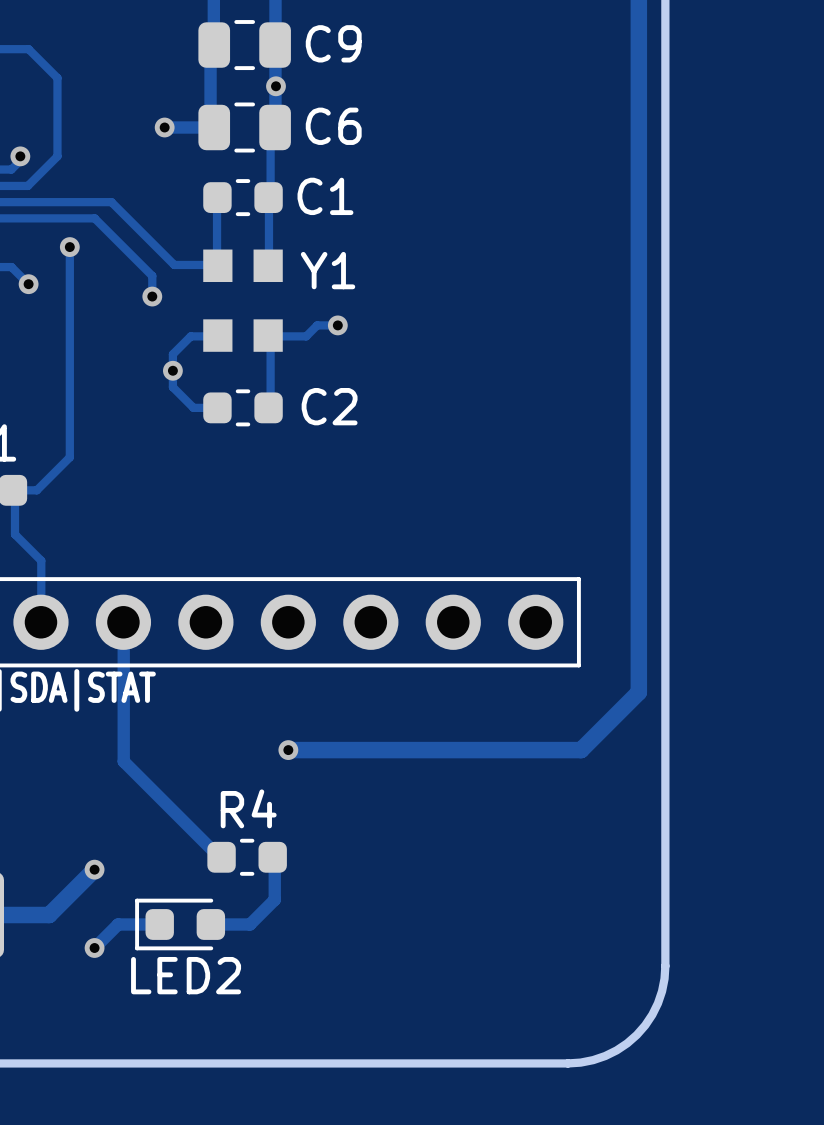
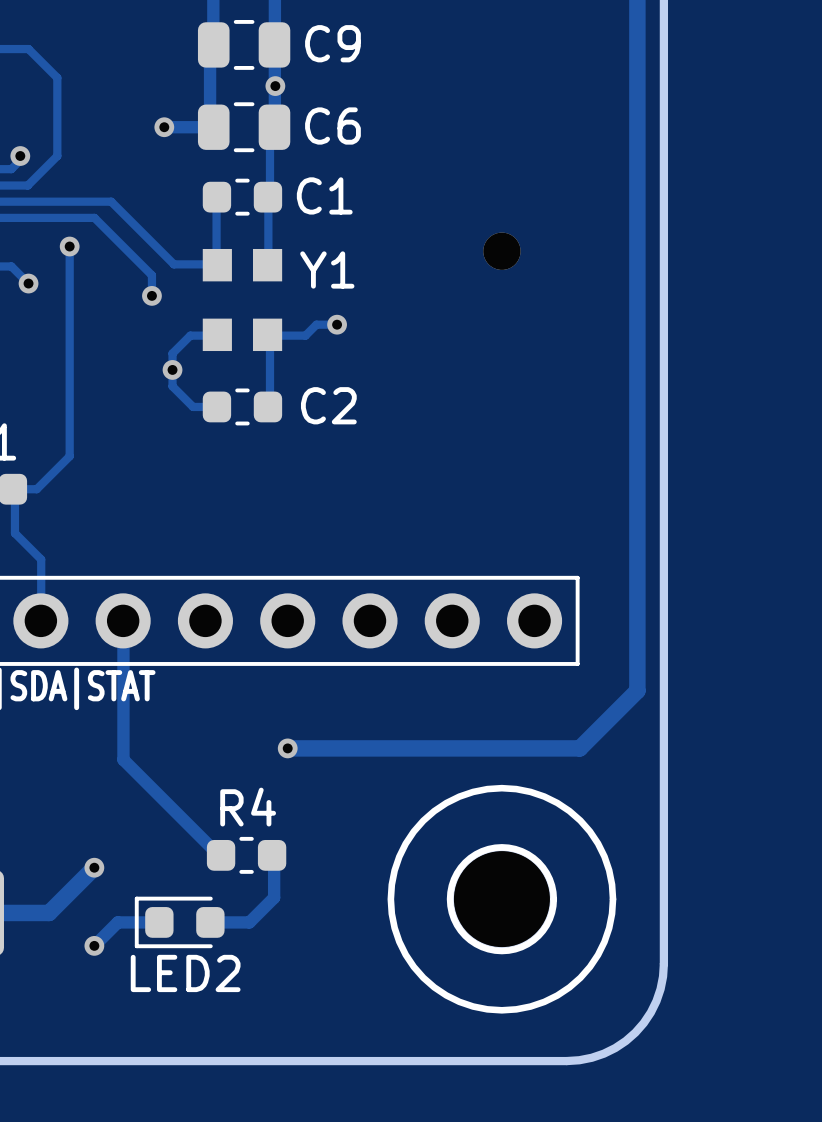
part: none -> (501, 251)
part: none -> (501, 899)

